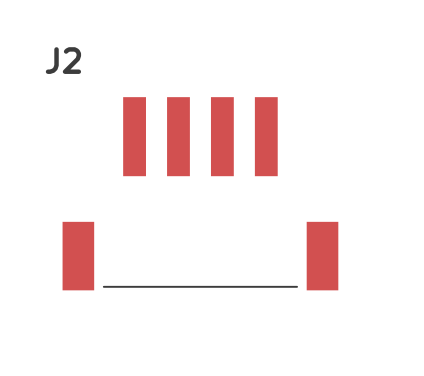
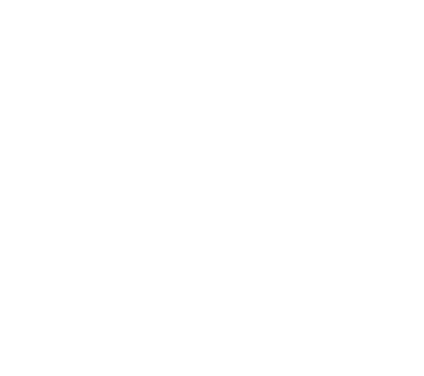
J2: (200, 193) -> none

